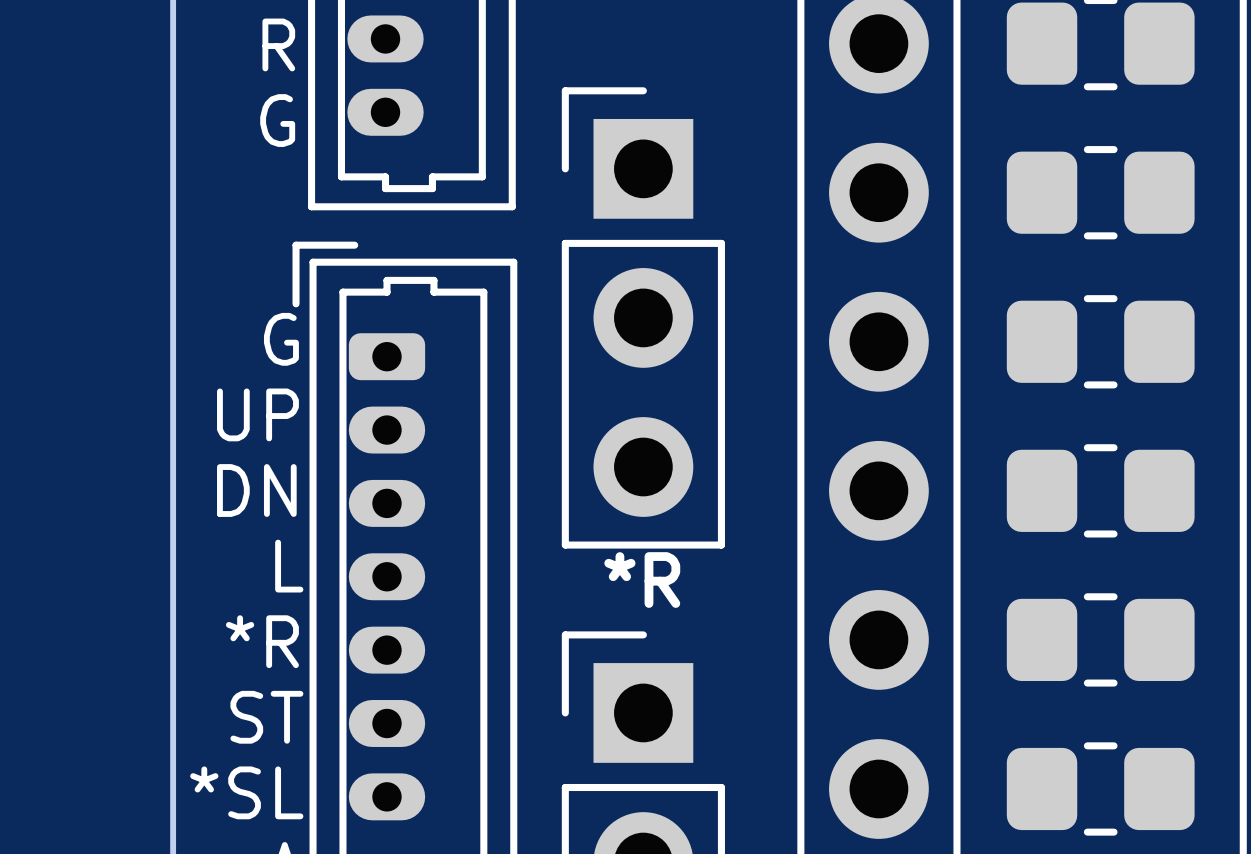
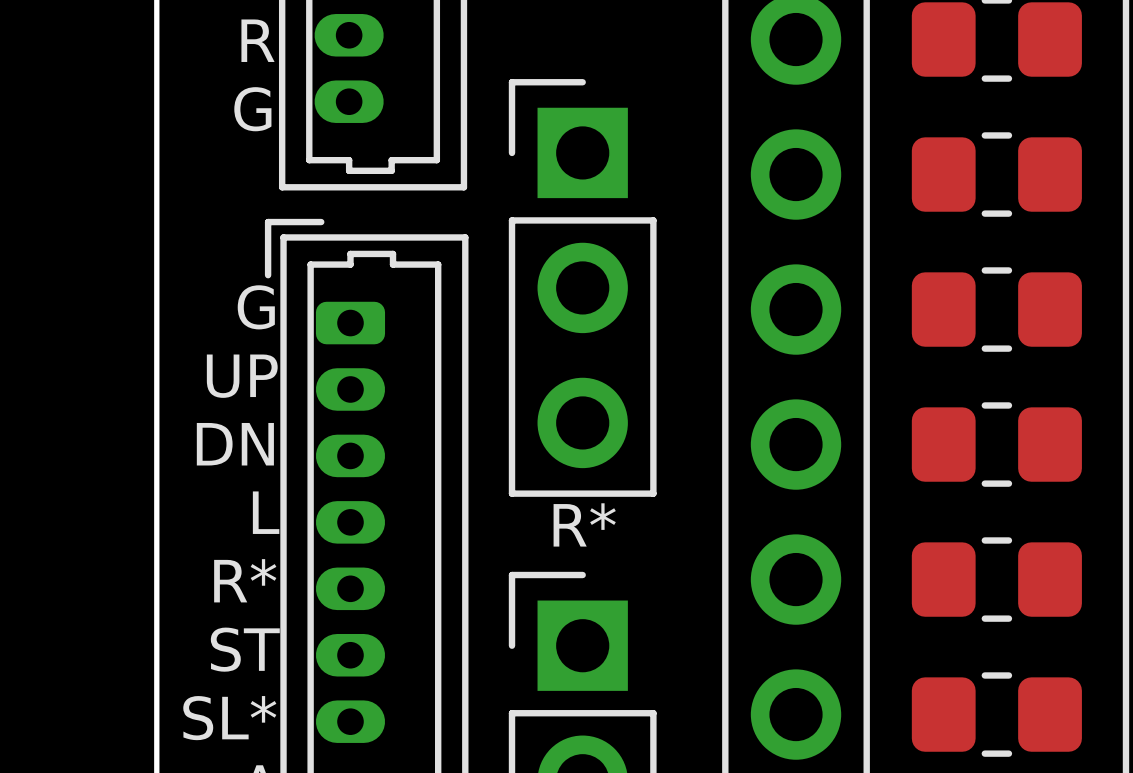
text: *R (642, 580) -> R* (584, 524)
text: *R (262, 641) -> R* (245, 580)
text: *SL (246, 792) -> SL* (229, 718)

